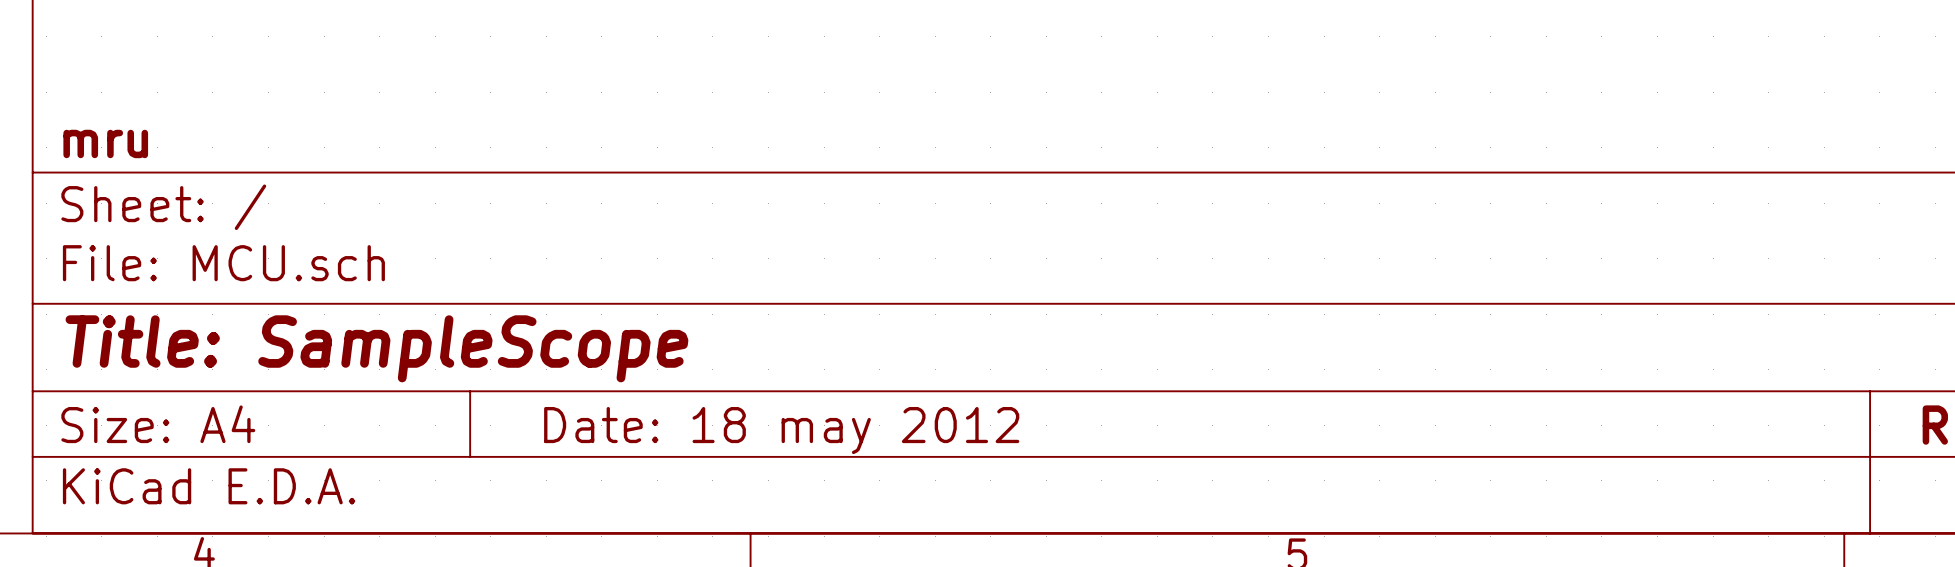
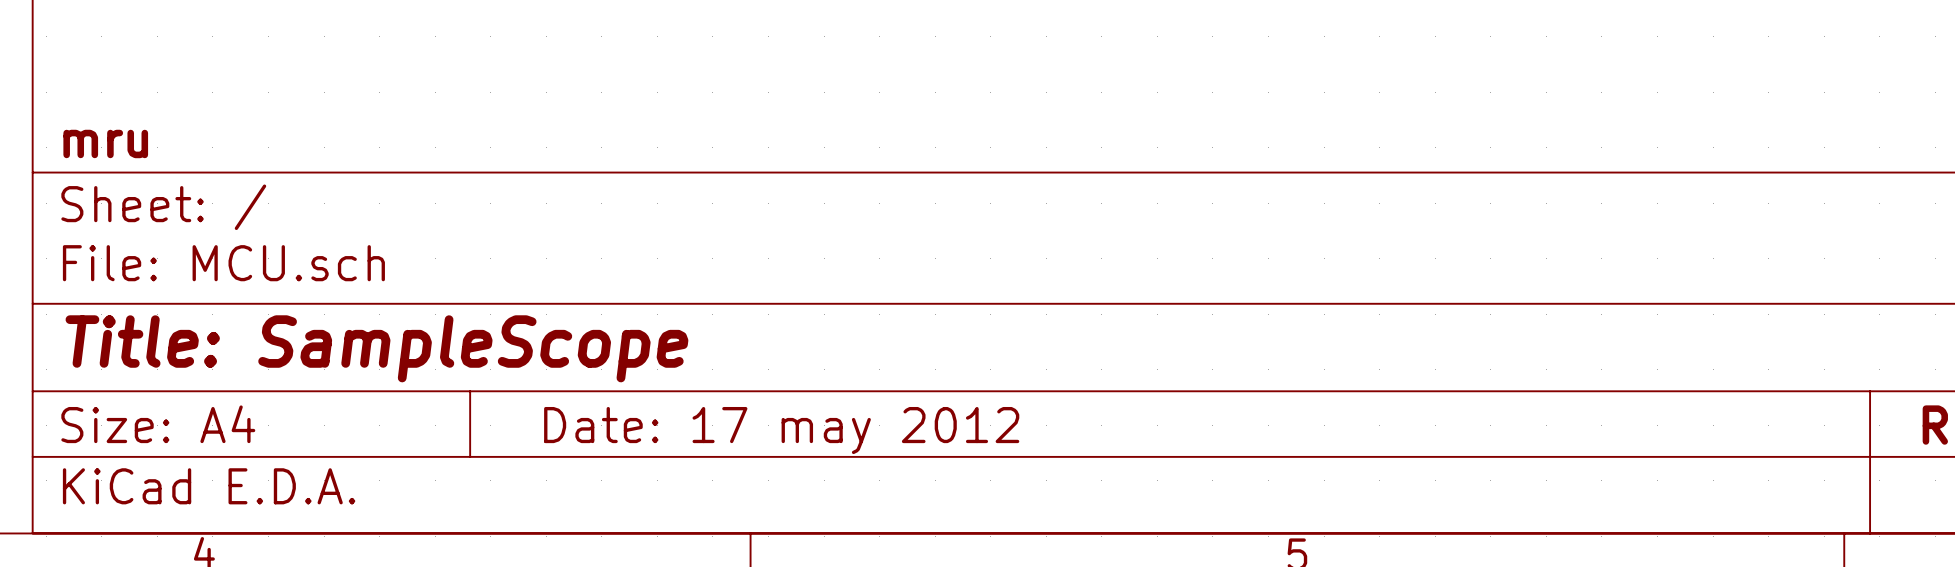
title block: Date: 18 may 2012 (781, 430) -> Date: 17 may 2012 (781, 430)

